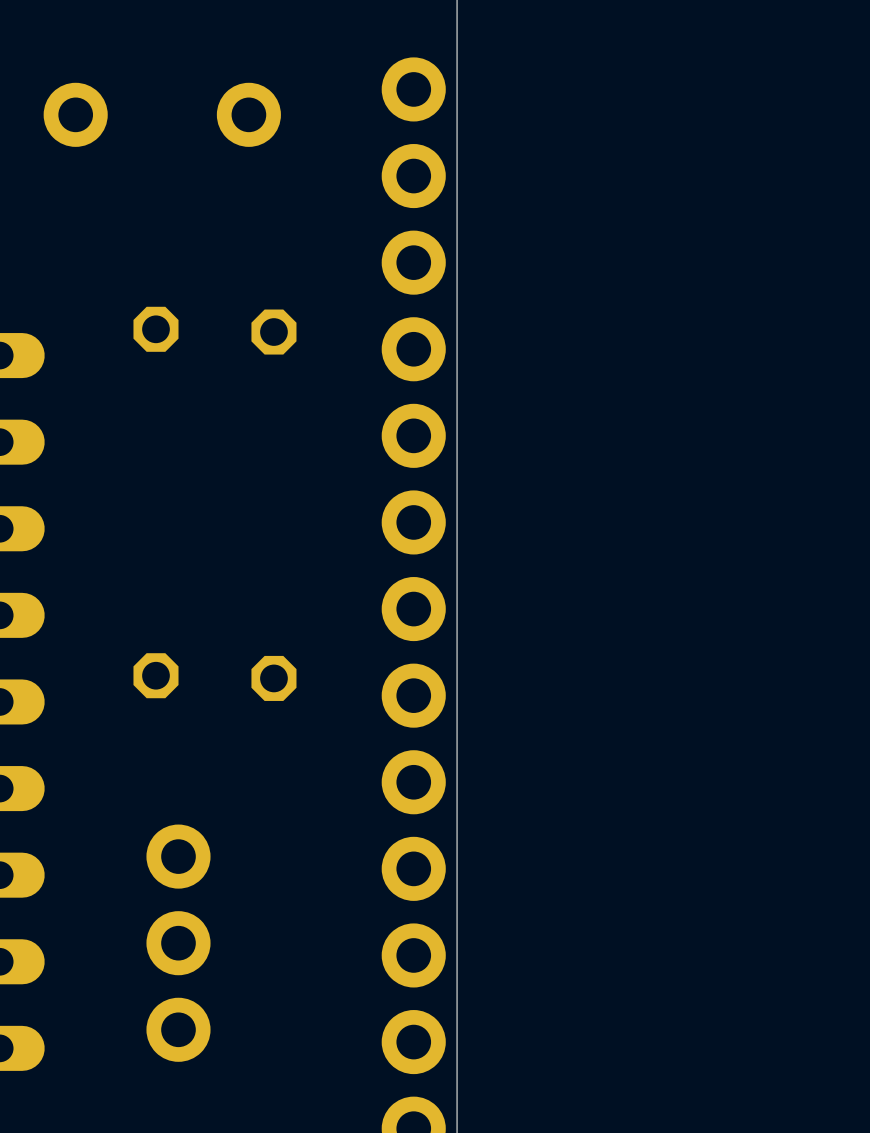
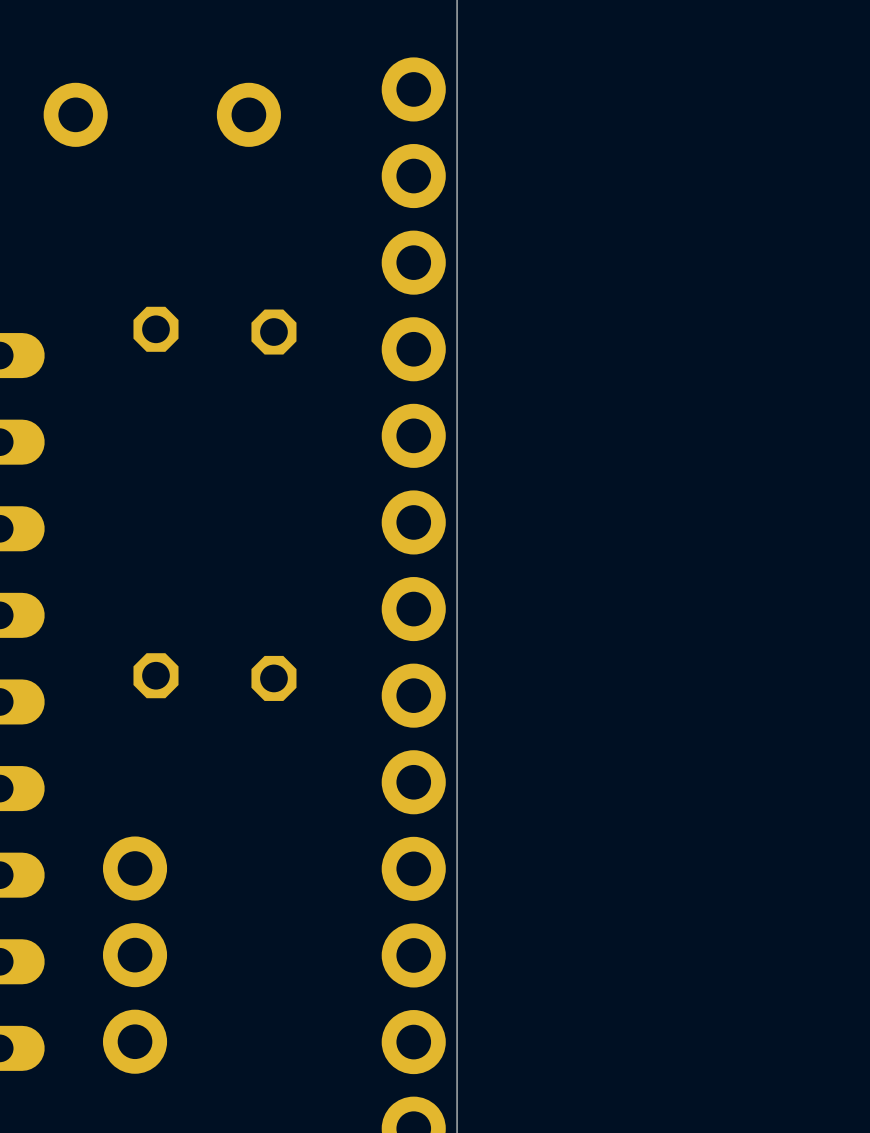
part position: (178, 943) -> (135, 955)

